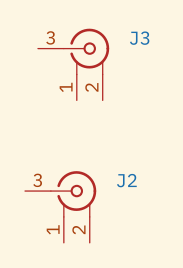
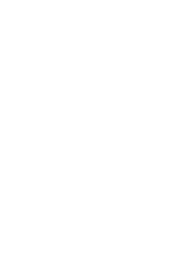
J3: (73, 64) -> none
J2: (60, 206) -> none

